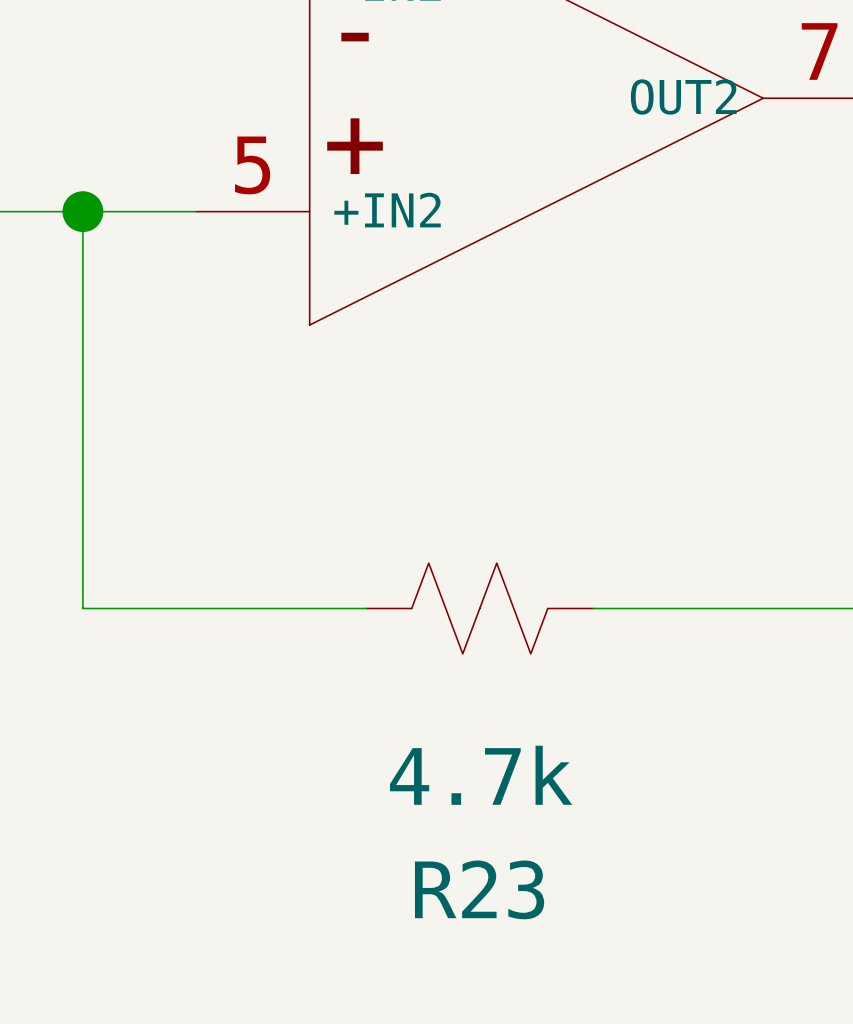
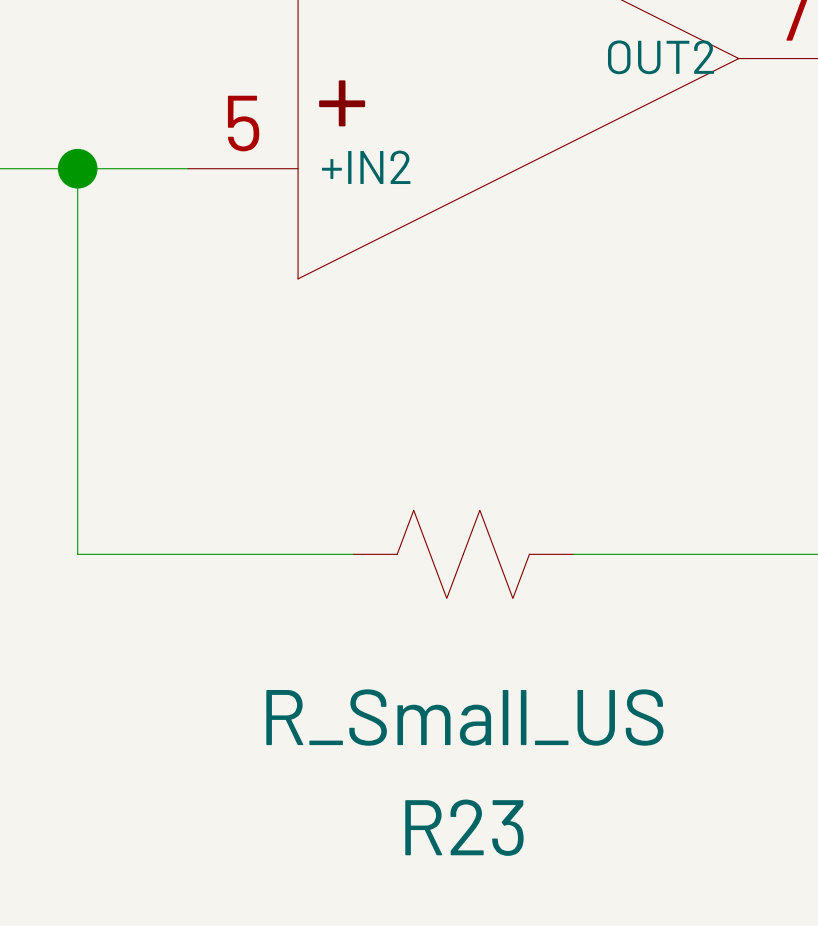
R23 value: 4.7k (481, 775) -> R_Small_US (464, 717)

